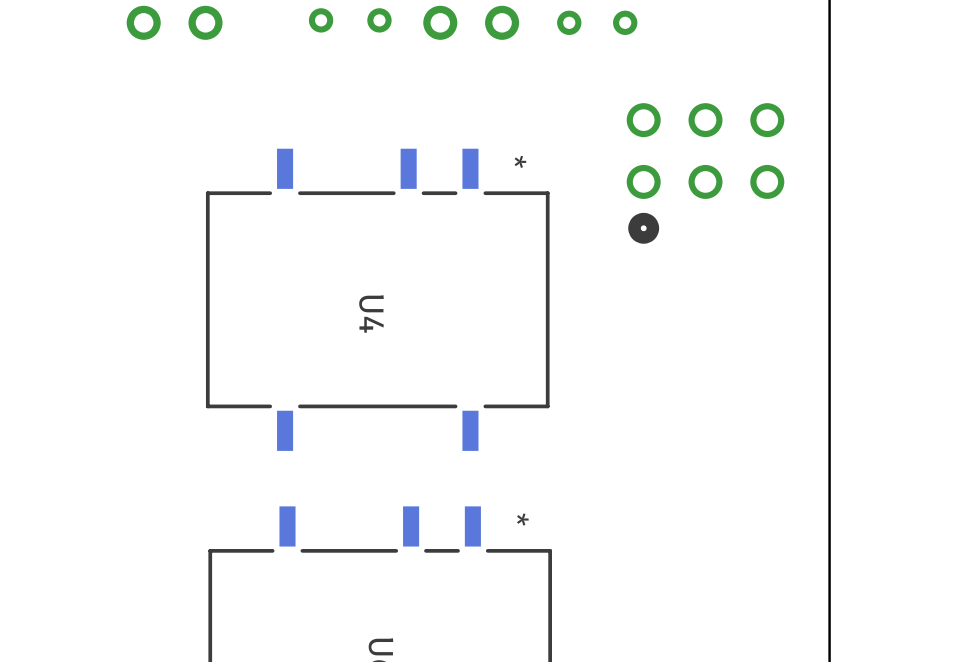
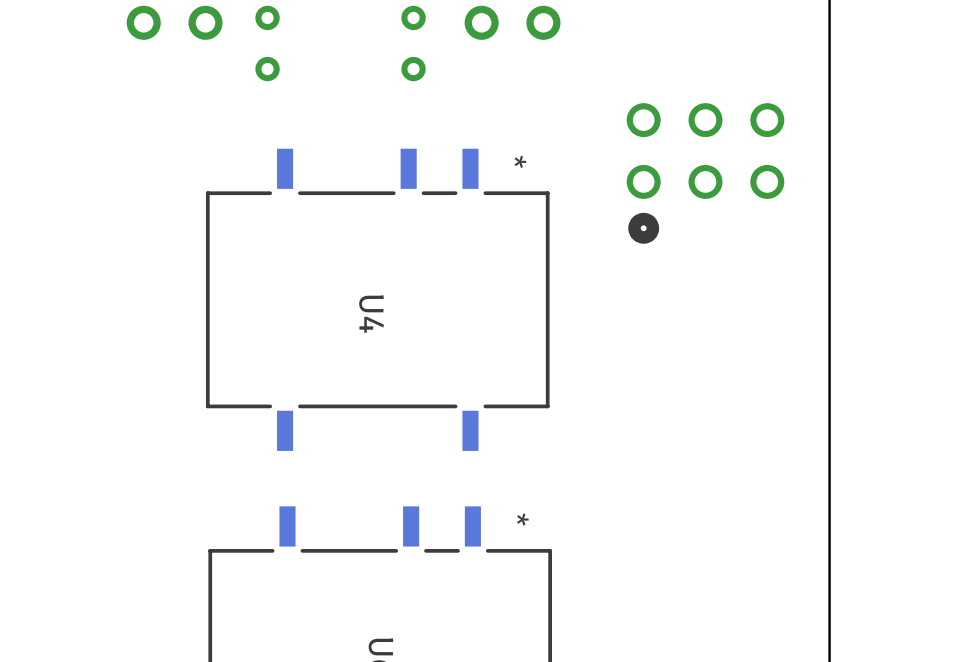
part: none -> (267, 17)
part: none -> (413, 17)
part: (321, 20) -> none
part: (379, 20) -> none
part position: (471, 22) -> (512, 22)
part: (569, 22) -> none
part: (625, 22) -> none
part: none -> (267, 69)
part: none -> (413, 69)

